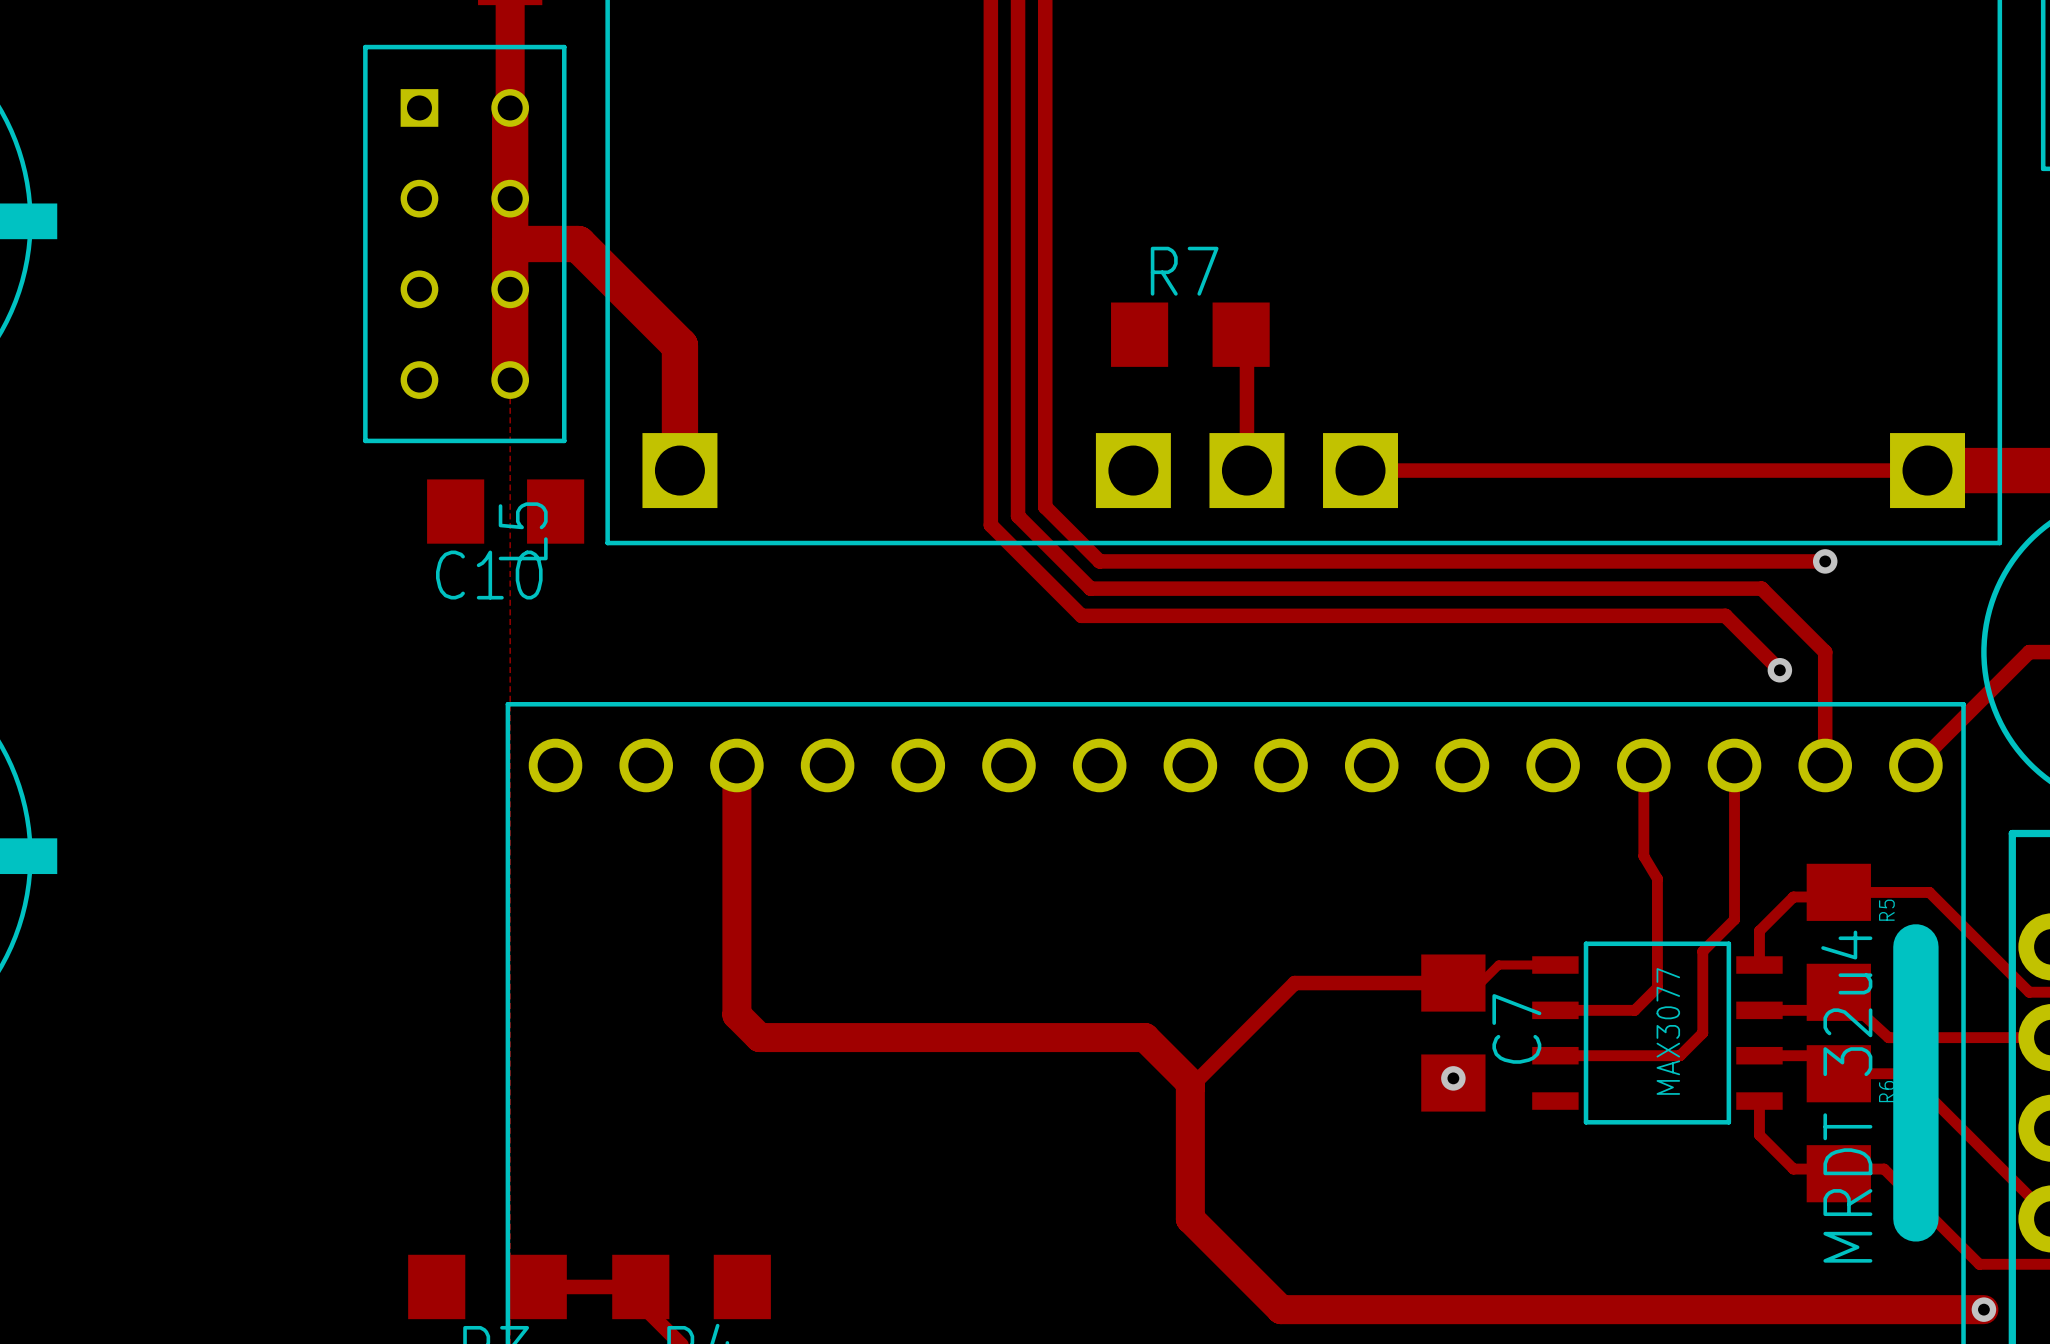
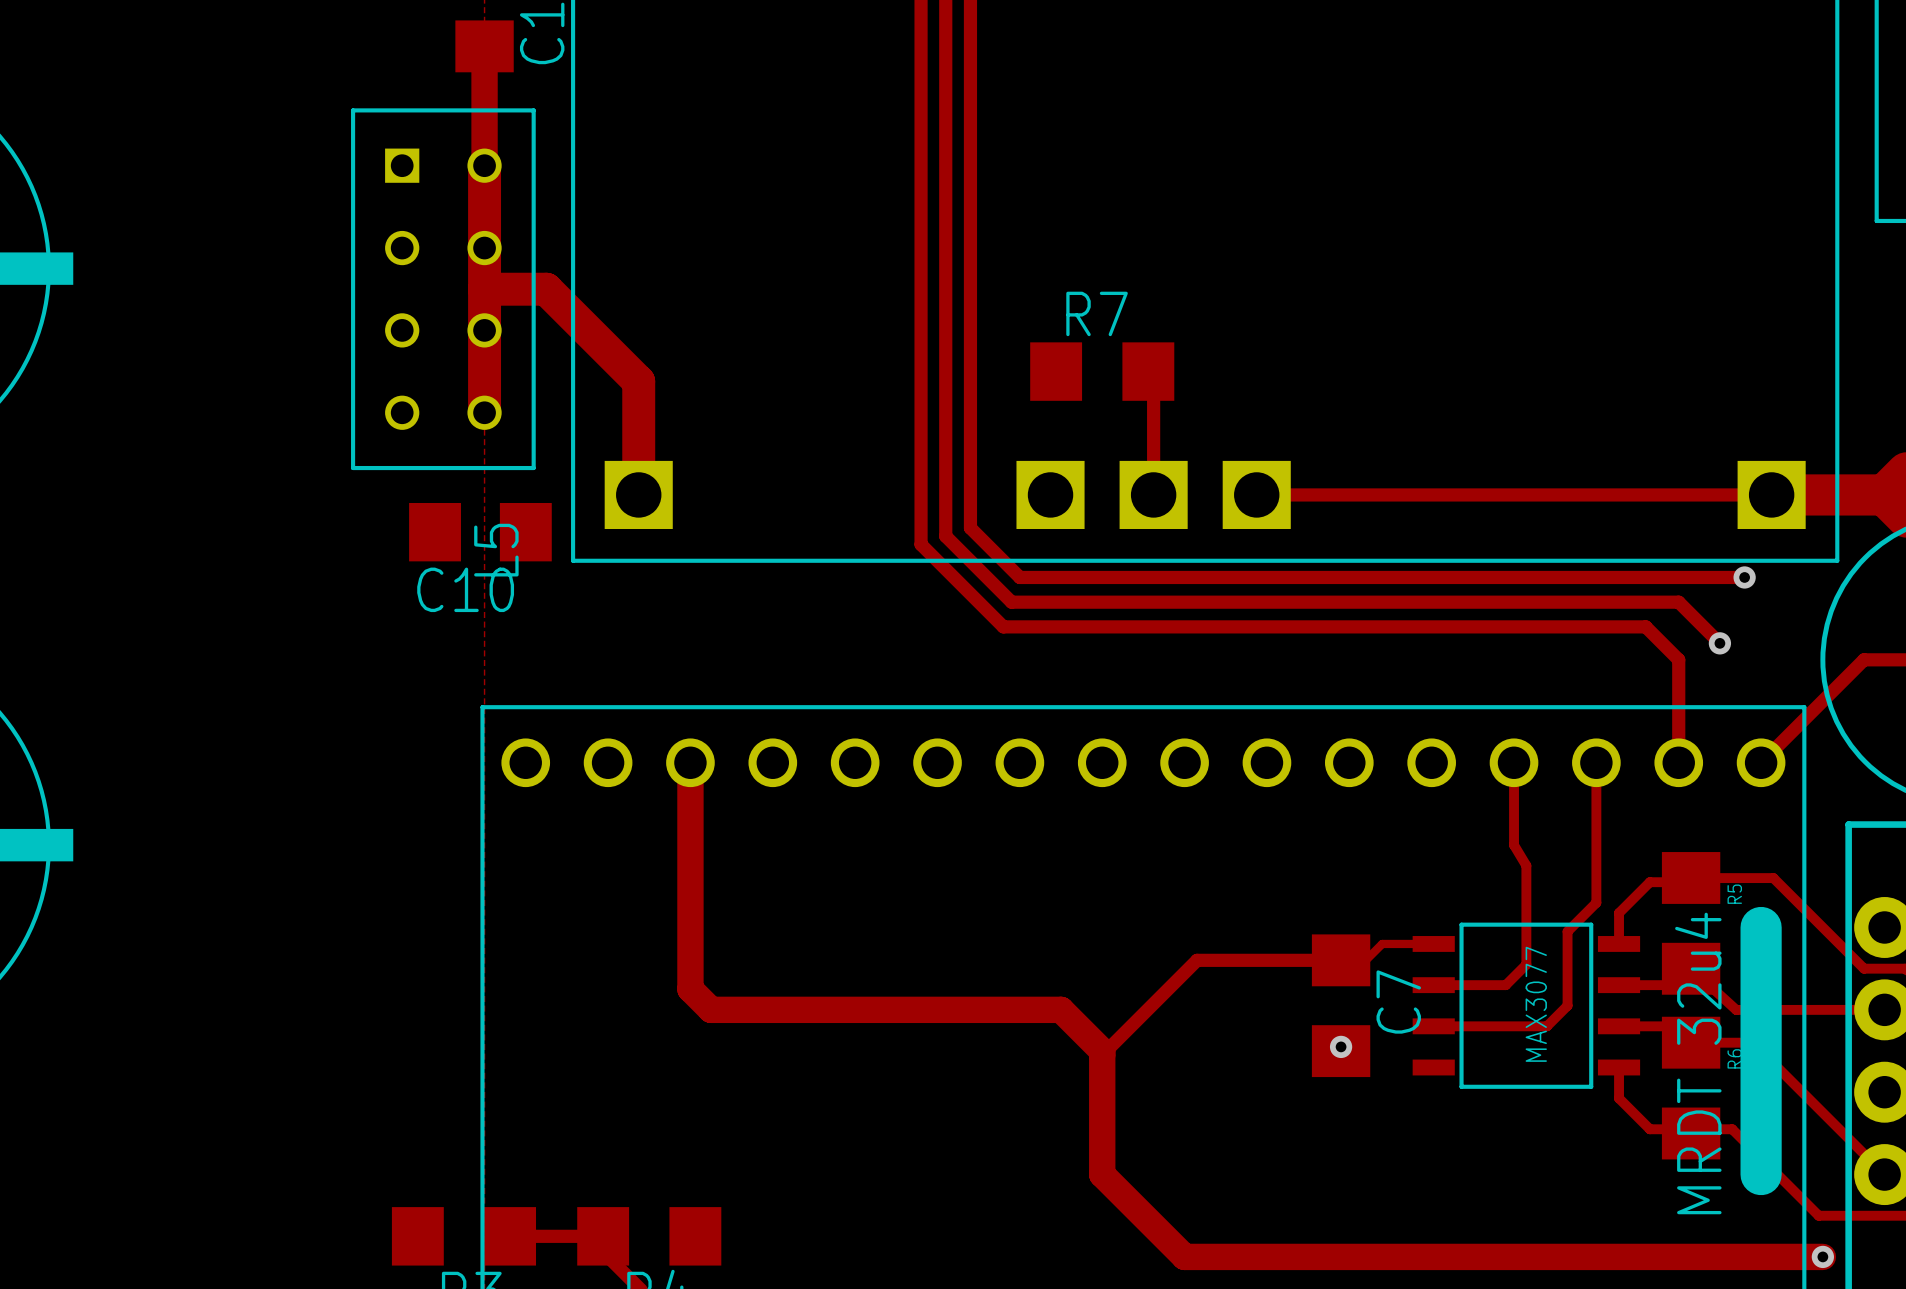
track: none -> (1678, 577) (1744, 577)
via: (1825, 561) -> none
via: none -> (1744, 577)
track: (1761, 588) (1788, 615) -> (1588, 626) (1645, 626)
track: none -> (1621, 602) (1678, 602) (1719, 643)
track: (1725, 615) (1779, 670) -> none
via: none -> (1719, 643)
via: (1779, 670) -> none

